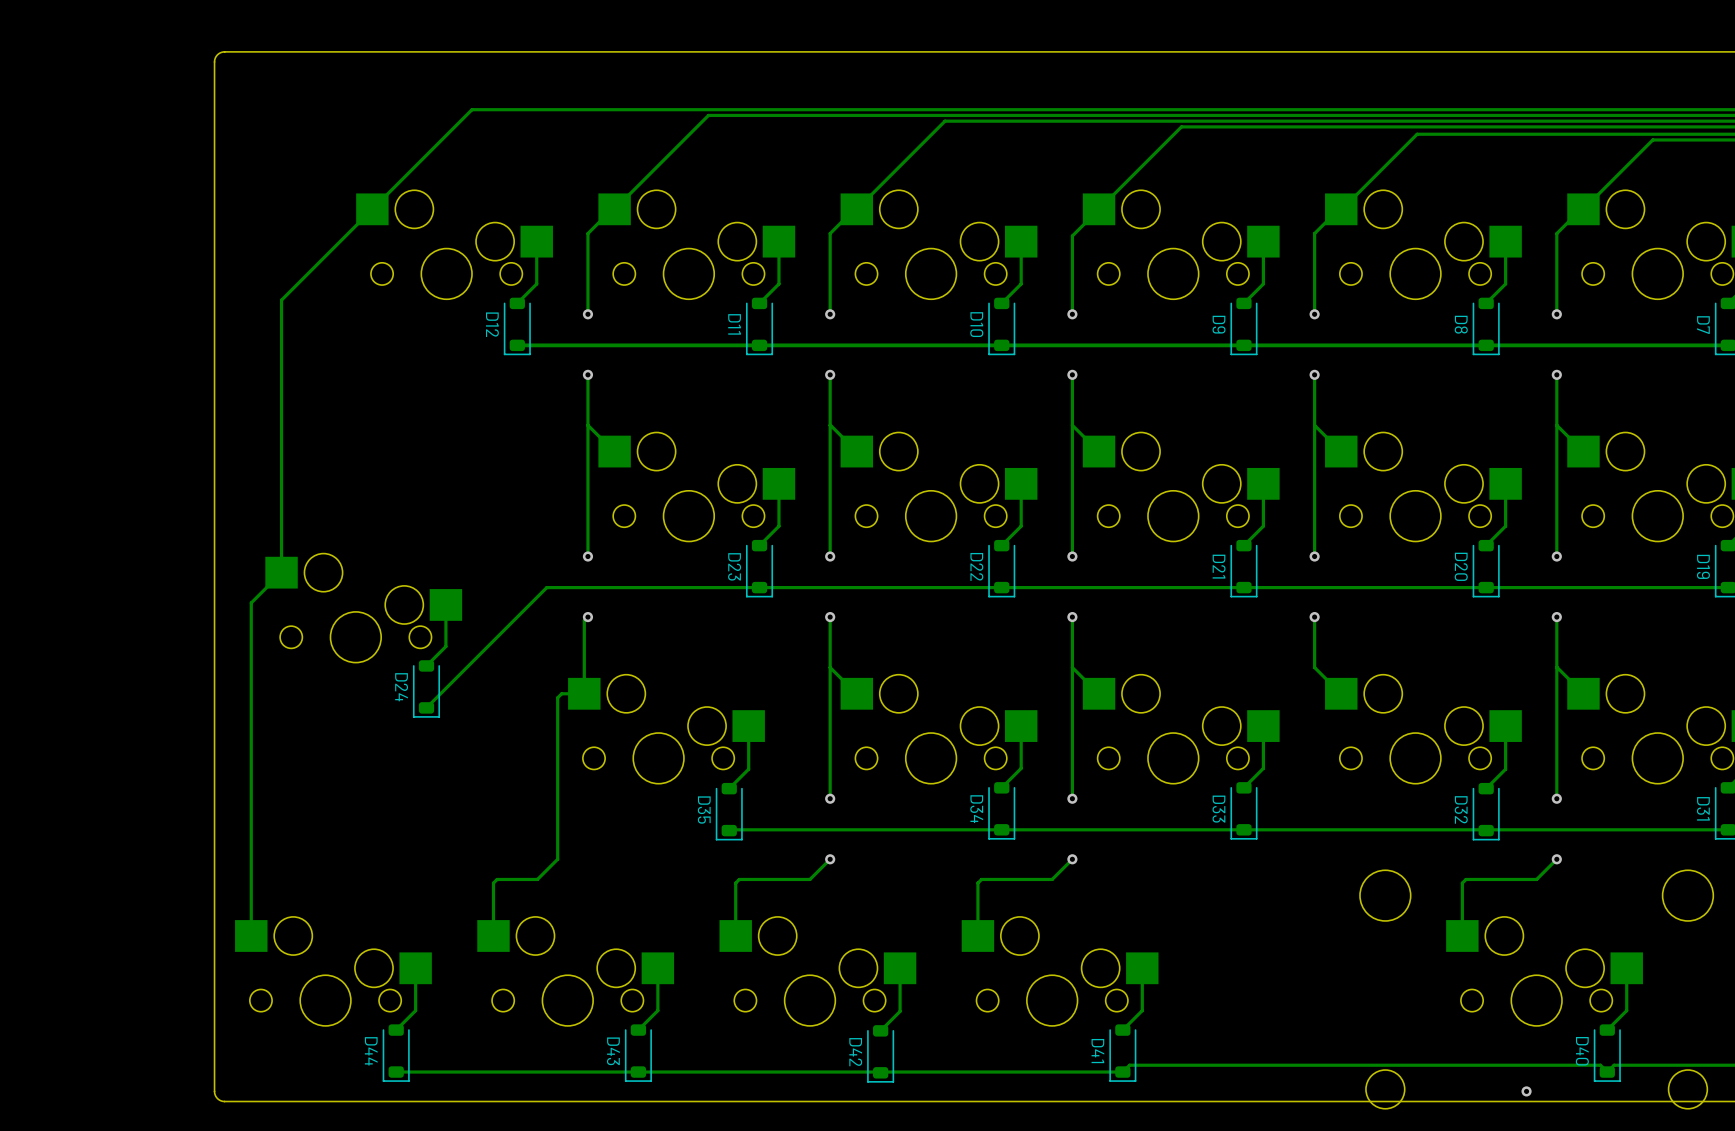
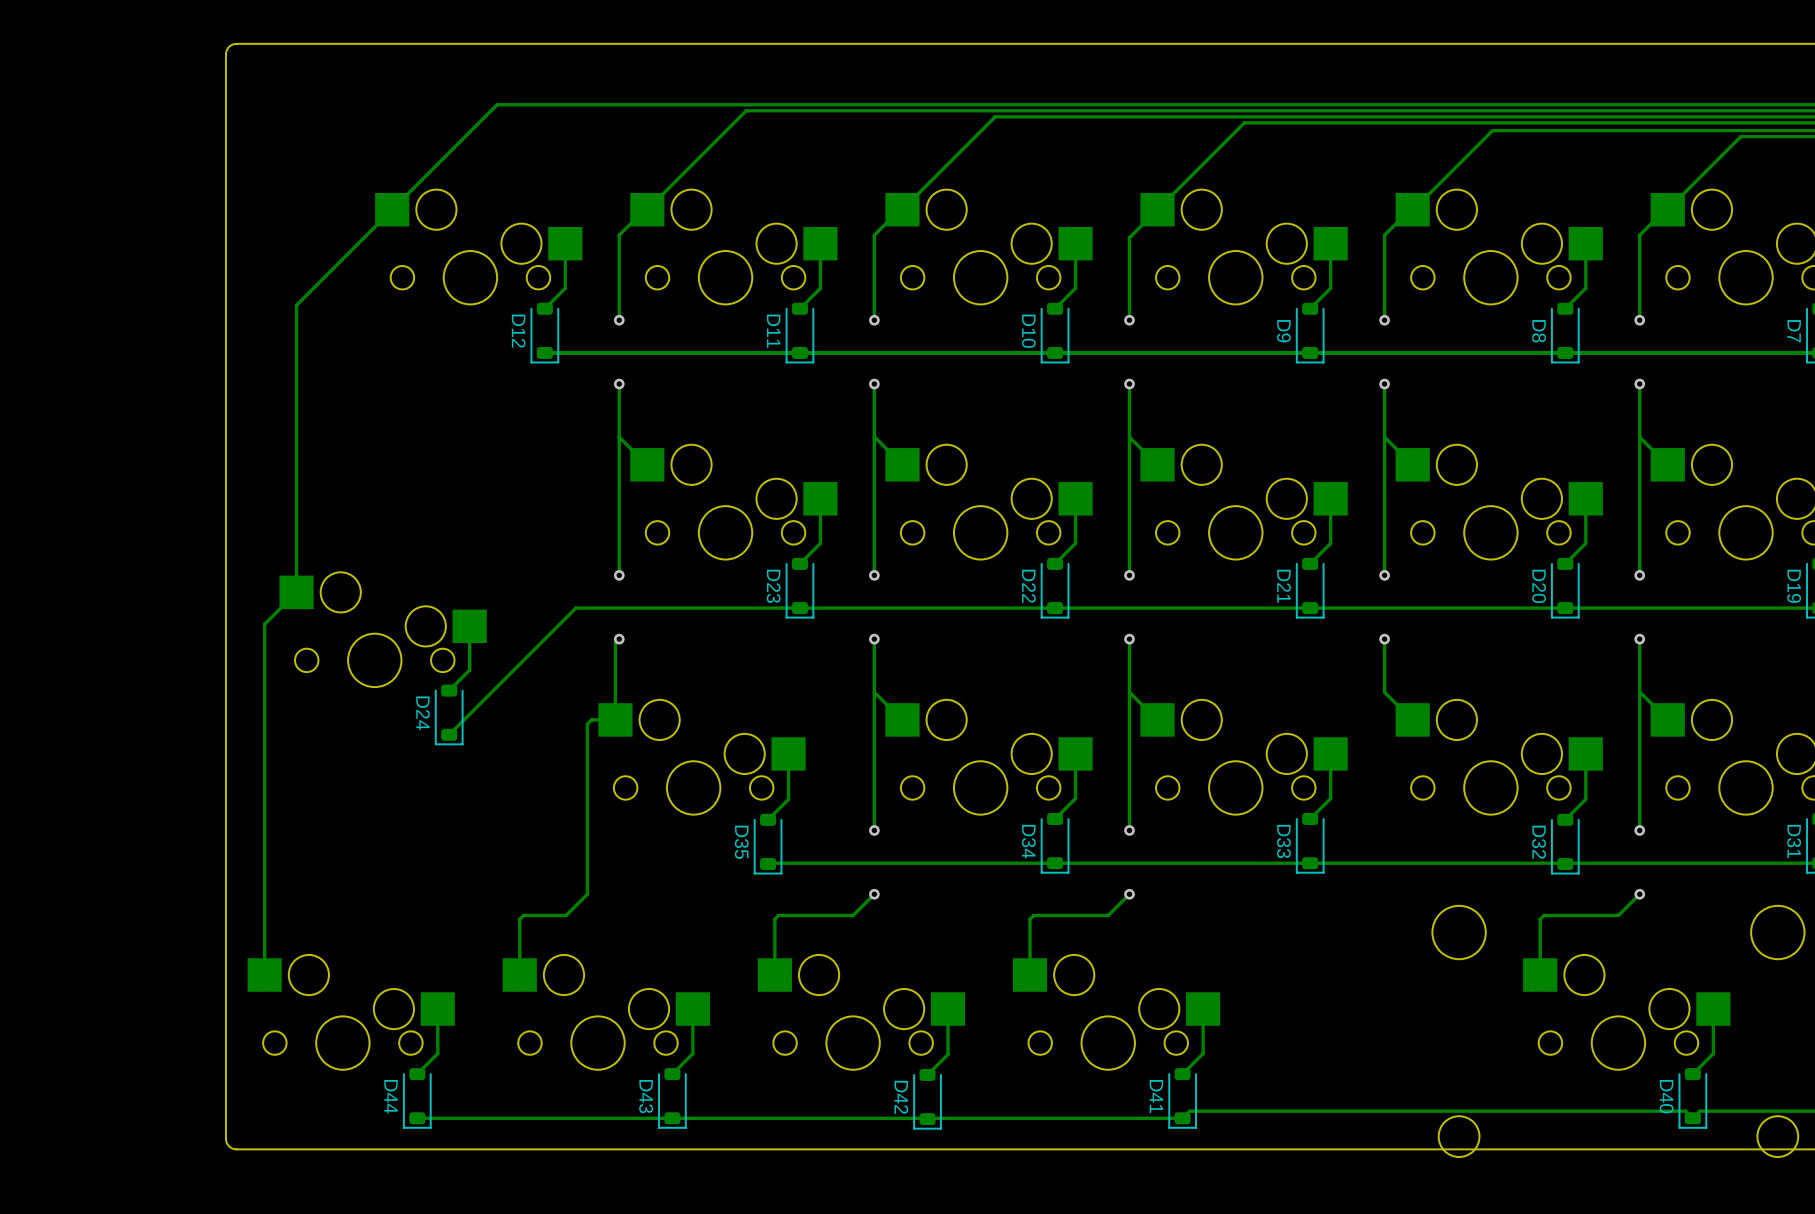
via: (1526, 1091) -> none

